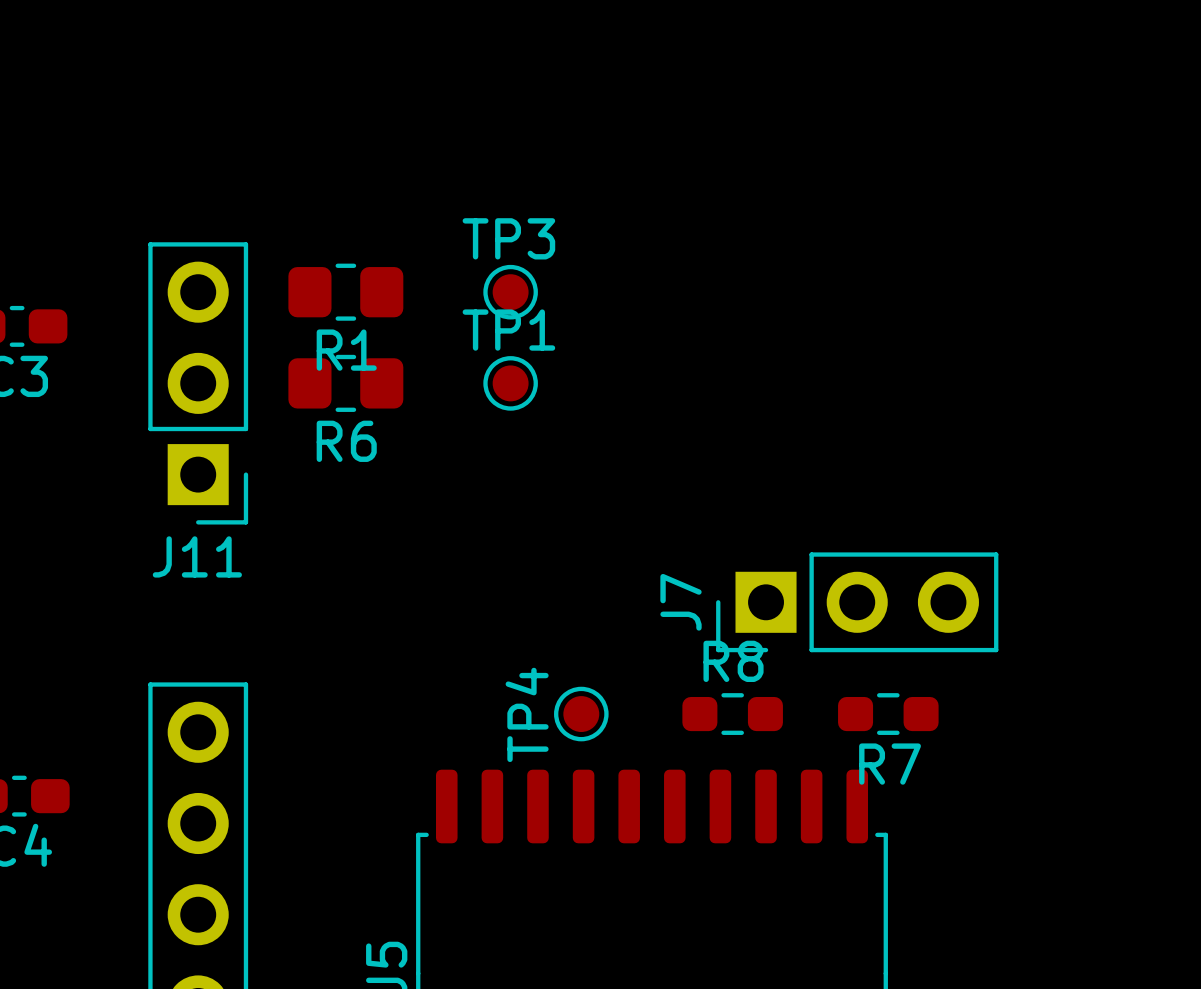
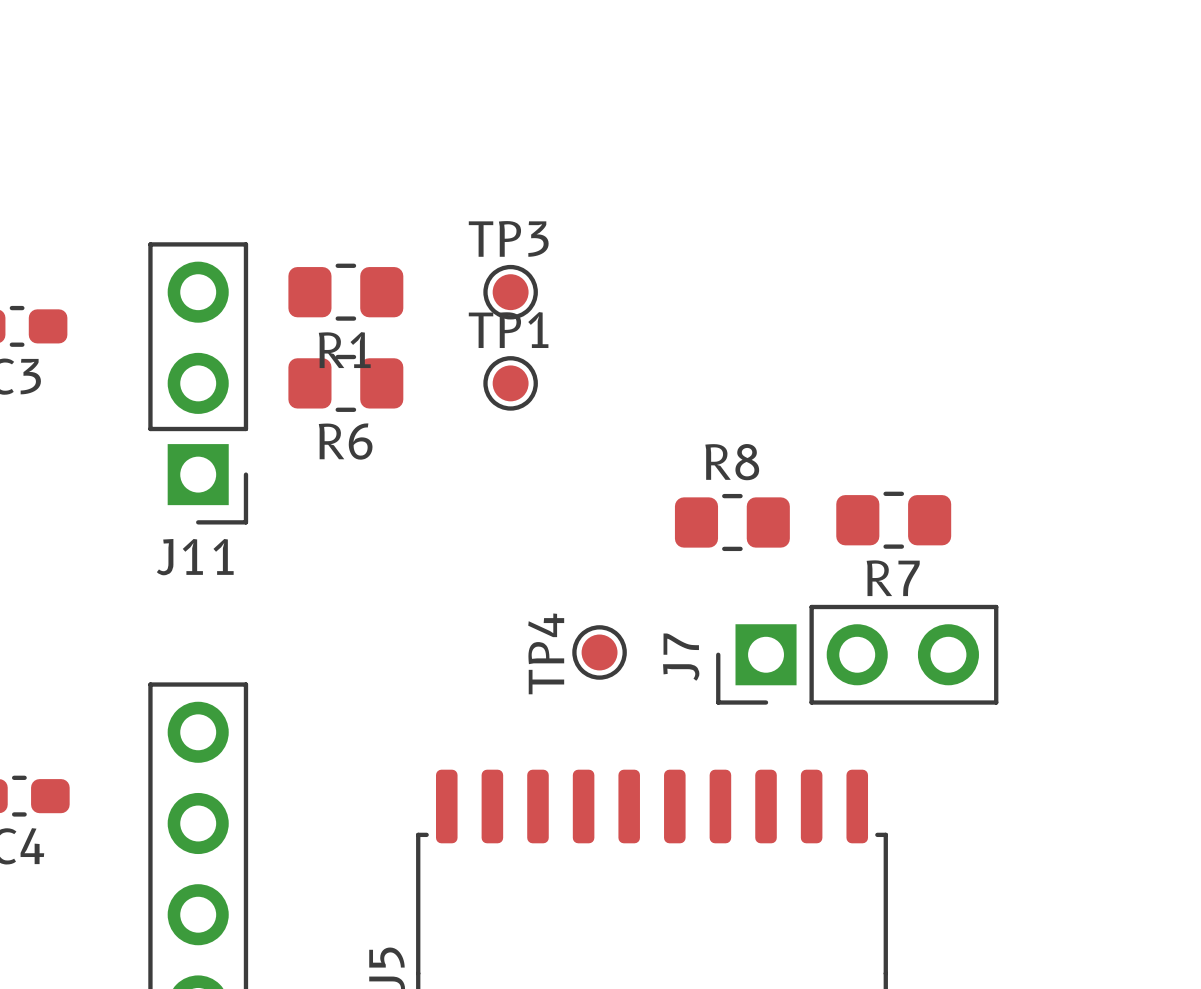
J7 position: (857, 602) -> (857, 654)
R8 footprint: [682, 693, 783, 735] -> [674, 493, 790, 552]
R7 footprint: [838, 693, 939, 735] -> [836, 491, 952, 549]
TP4 position: (581, 714) -> (599, 652)

